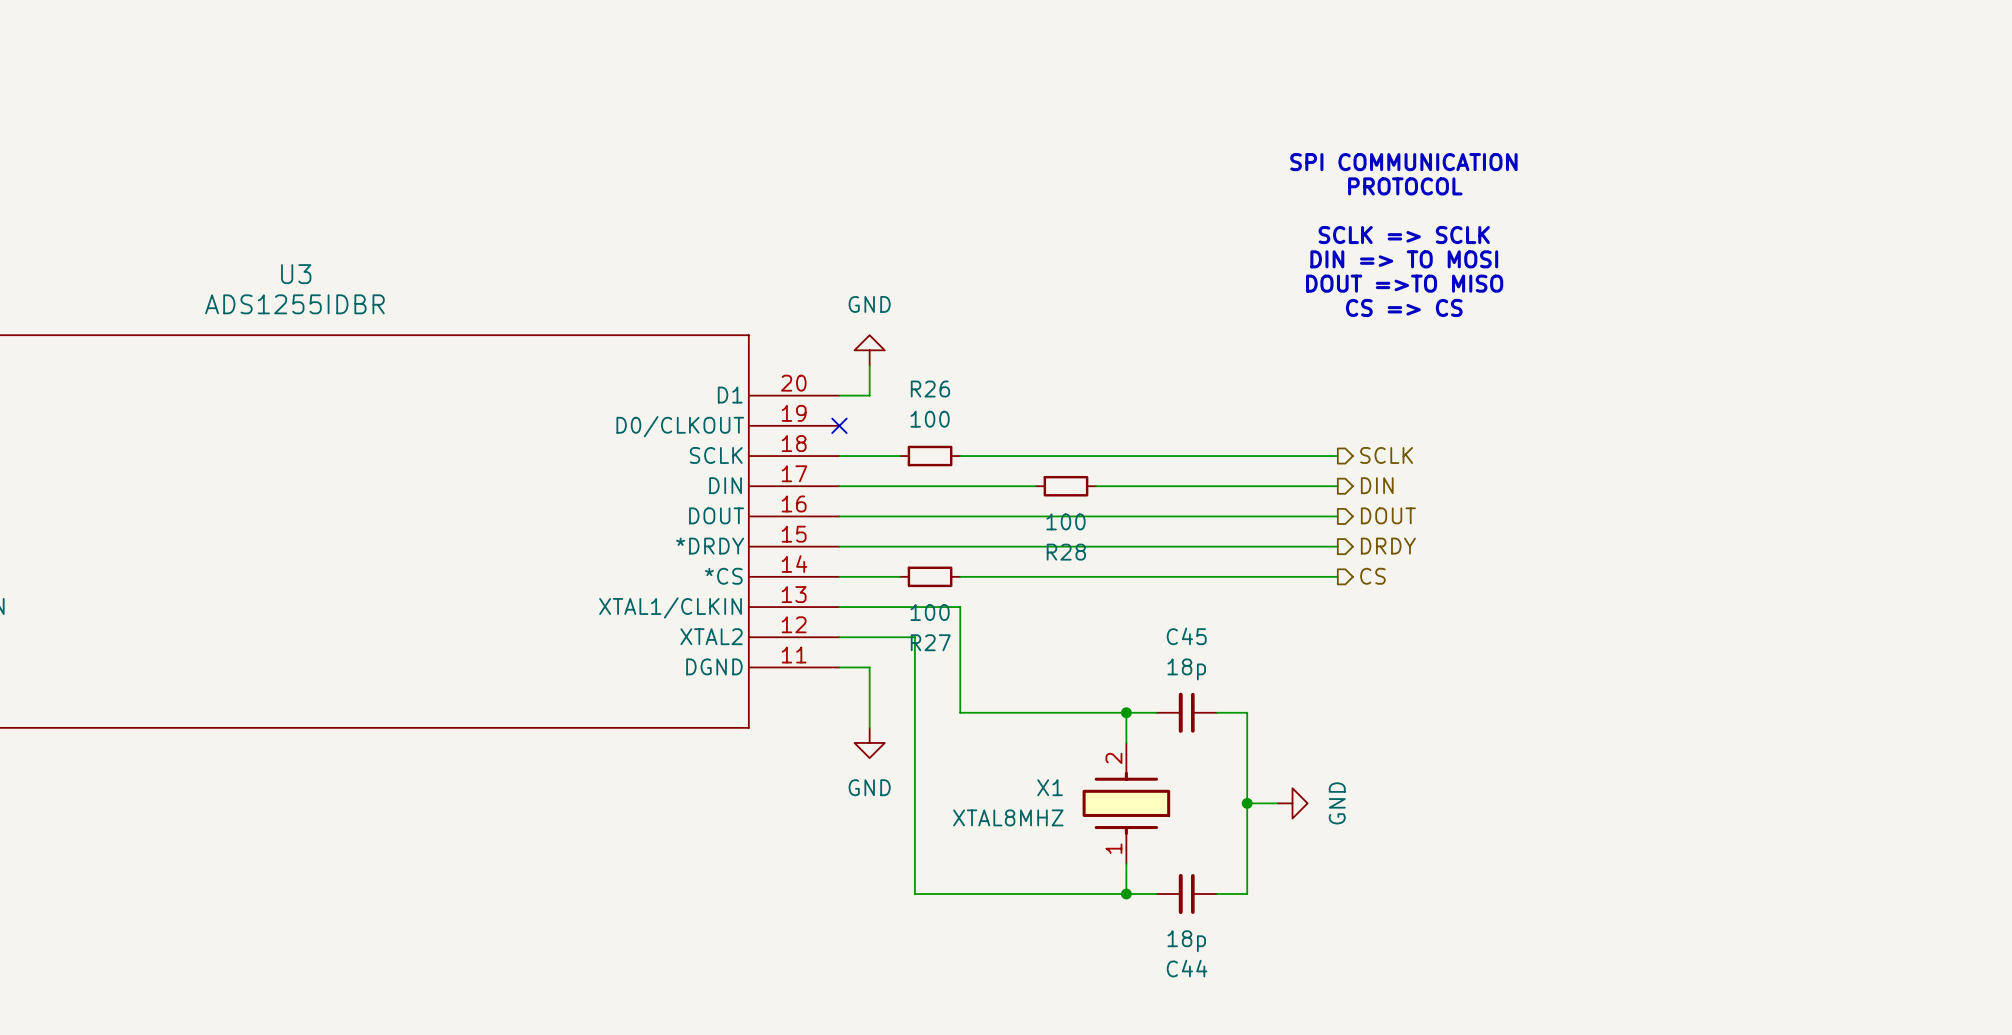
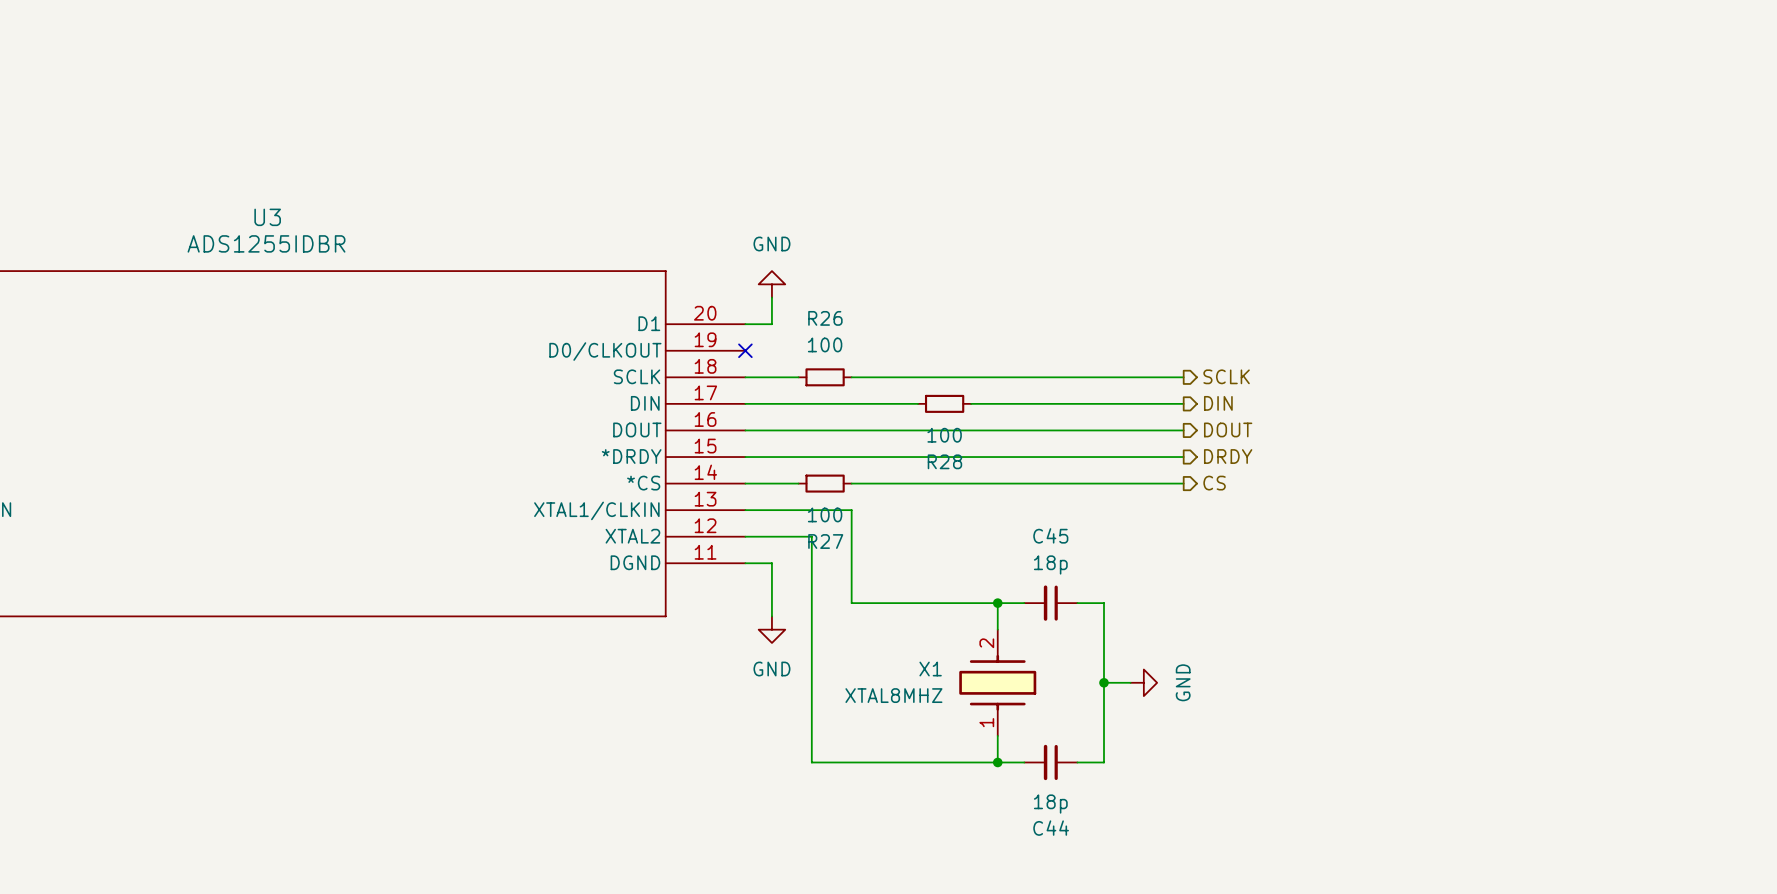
text: SPI COMMUNICATION (1403, 162) -> none
text: PROTOCOL (1405, 186) -> none
text: SCLK => SCLK (1404, 235) -> none
text: DIN => TO MOSI (1404, 259) -> none
text: DOUT =>TO MISO (1404, 283) -> none
text: CS => CS (1404, 307) -> none

